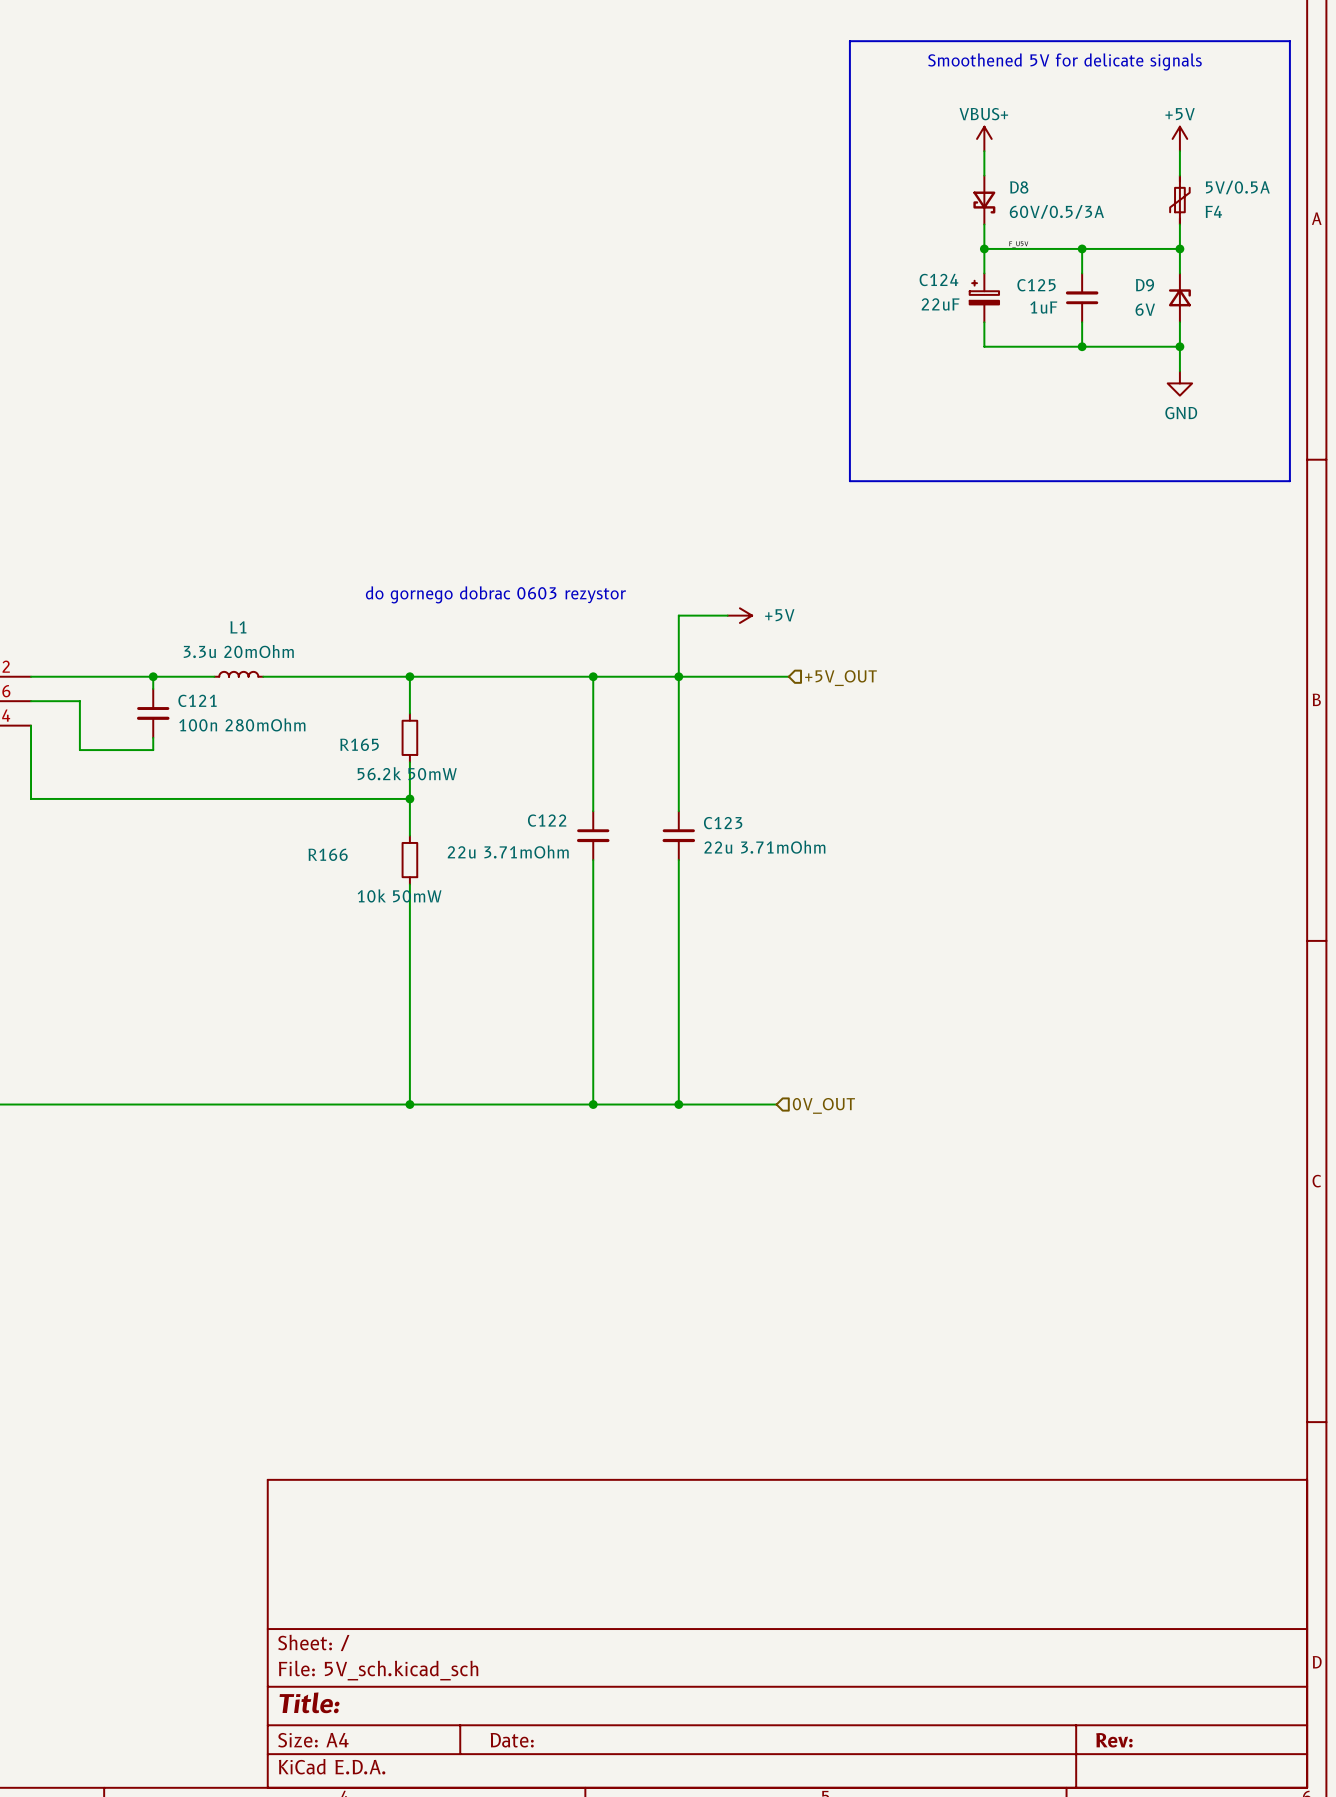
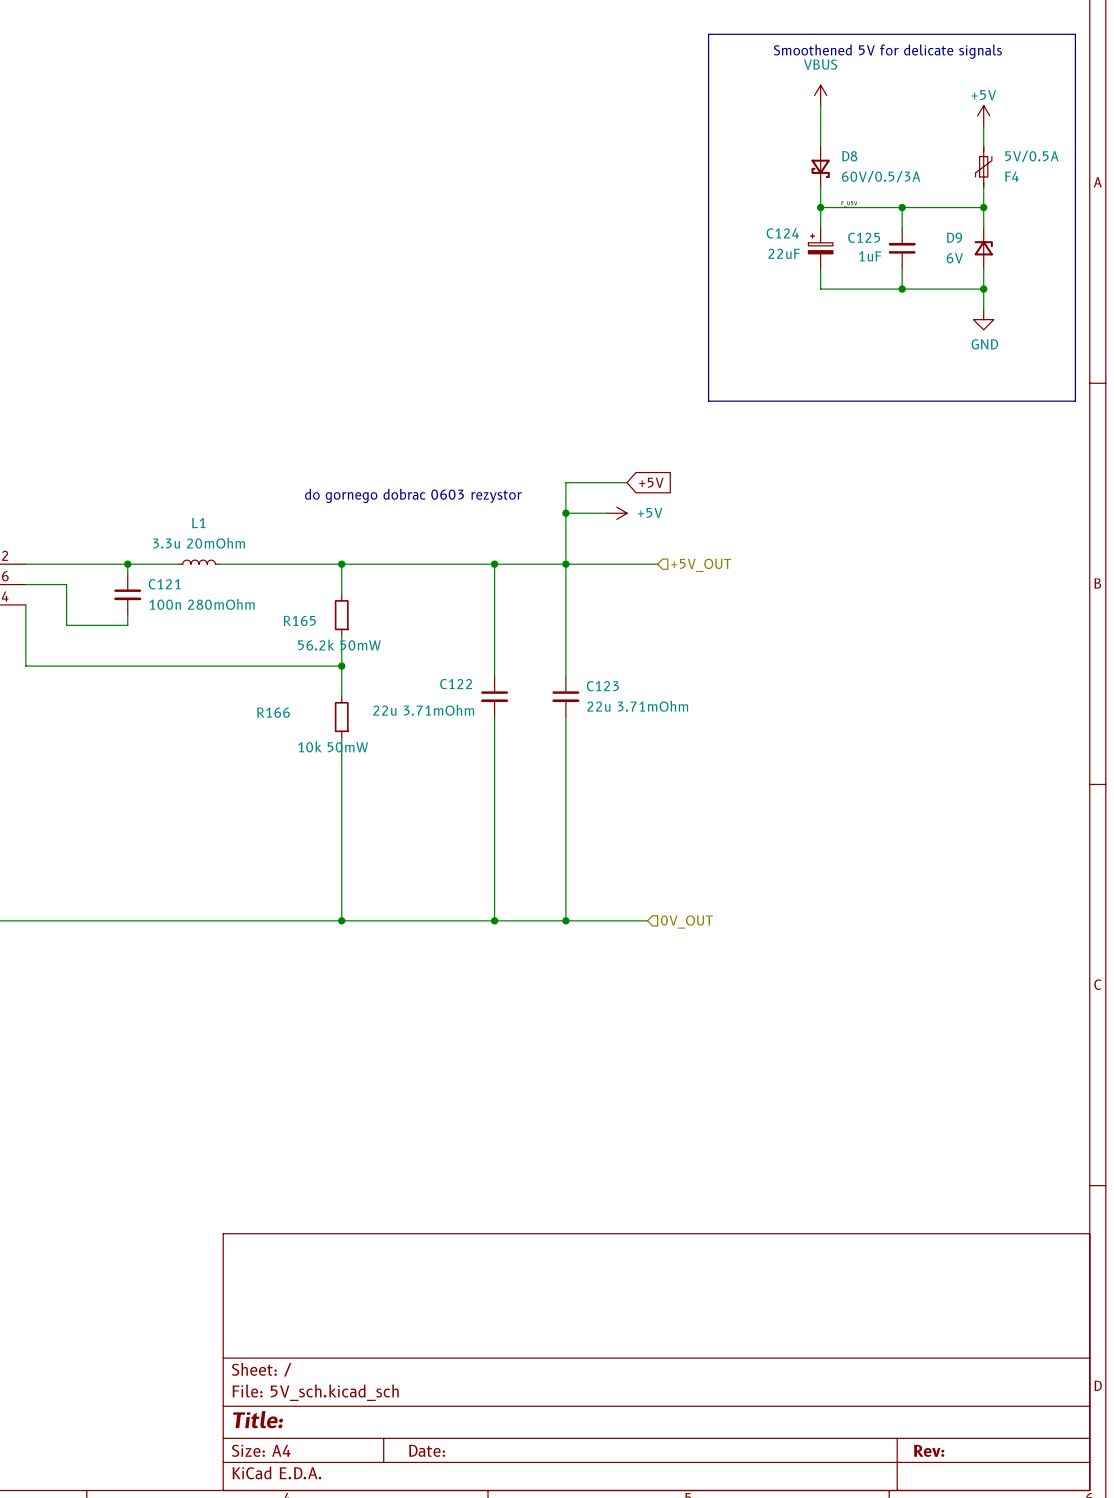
power symbol: none -> VBUS (820, 95)
power symbol: VBUS+ (984, 138) -> none
wire: none -> (627, 482) (565, 482) (565, 513)
global label: none -> +5V (651, 482)
junction: none -> (565, 513)

